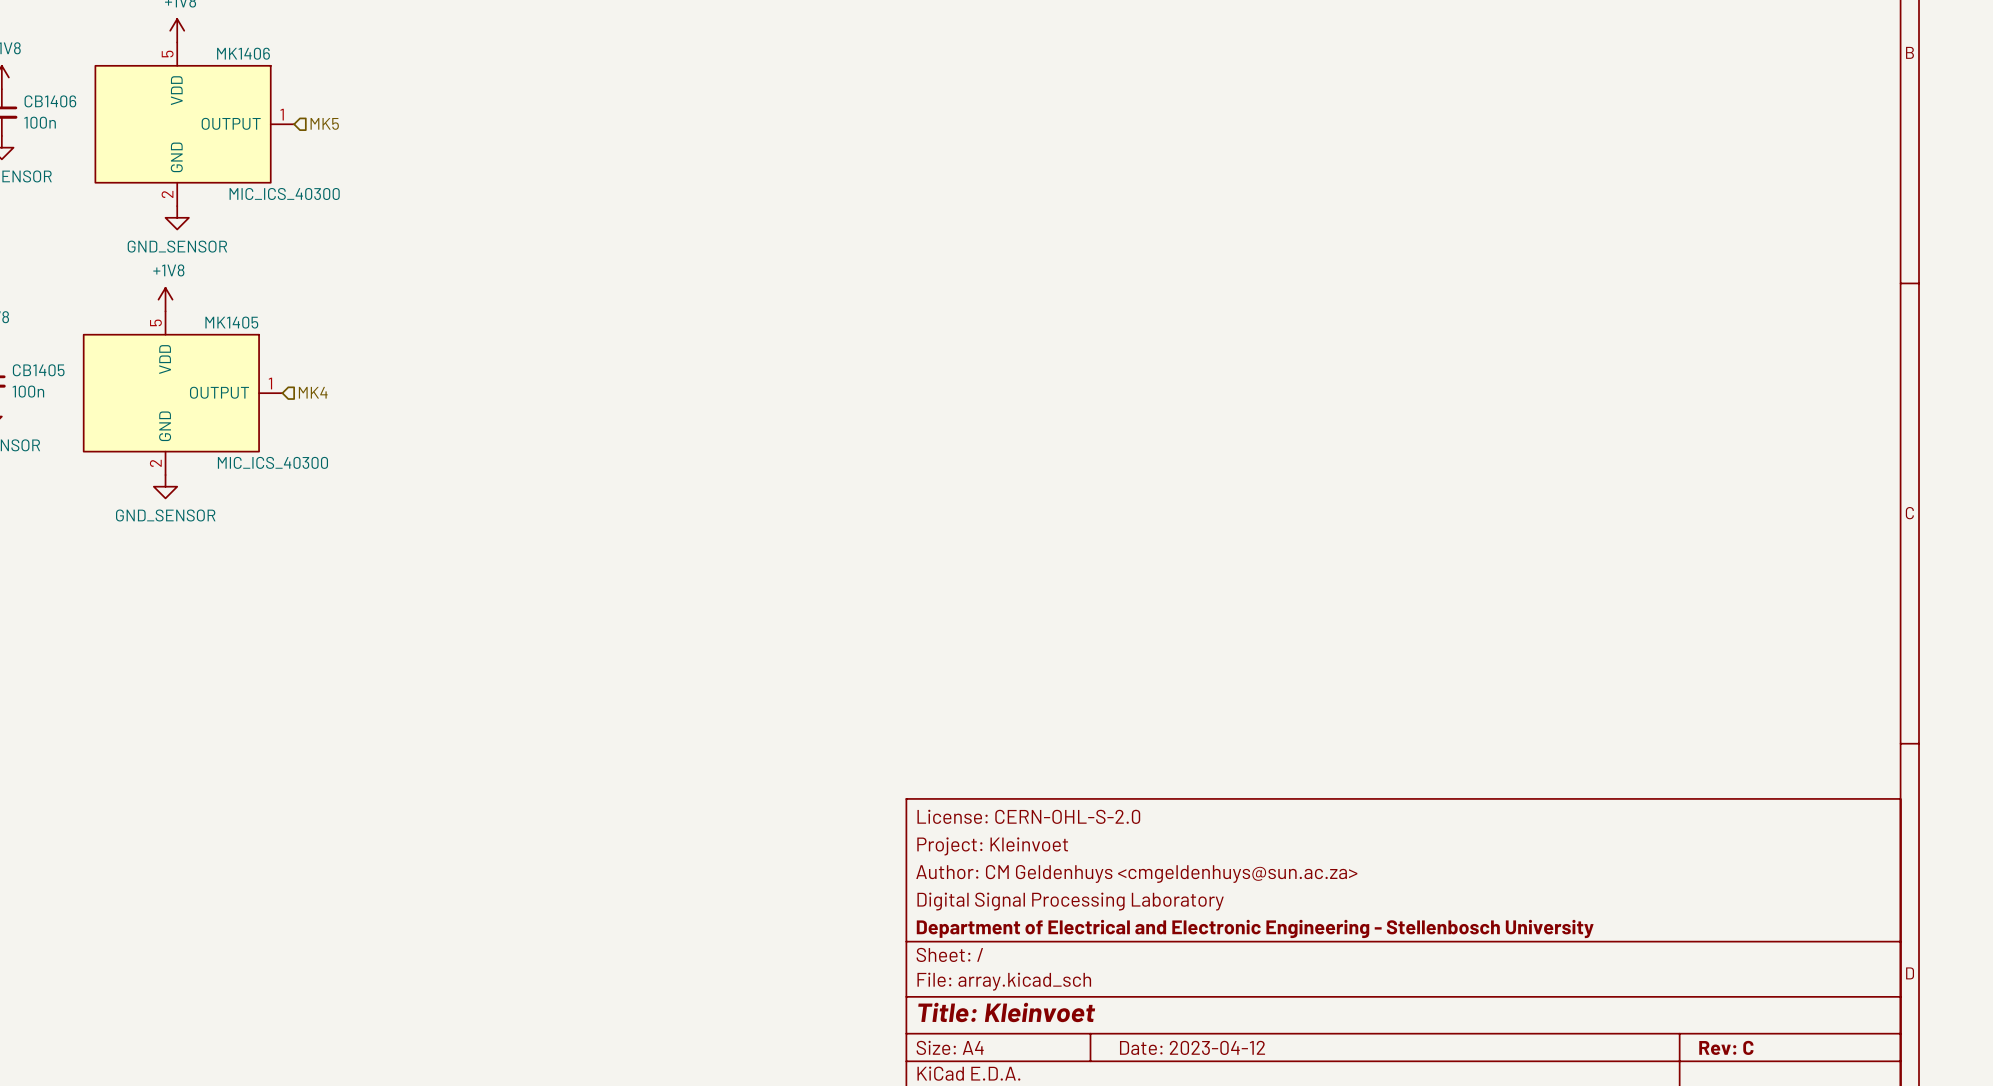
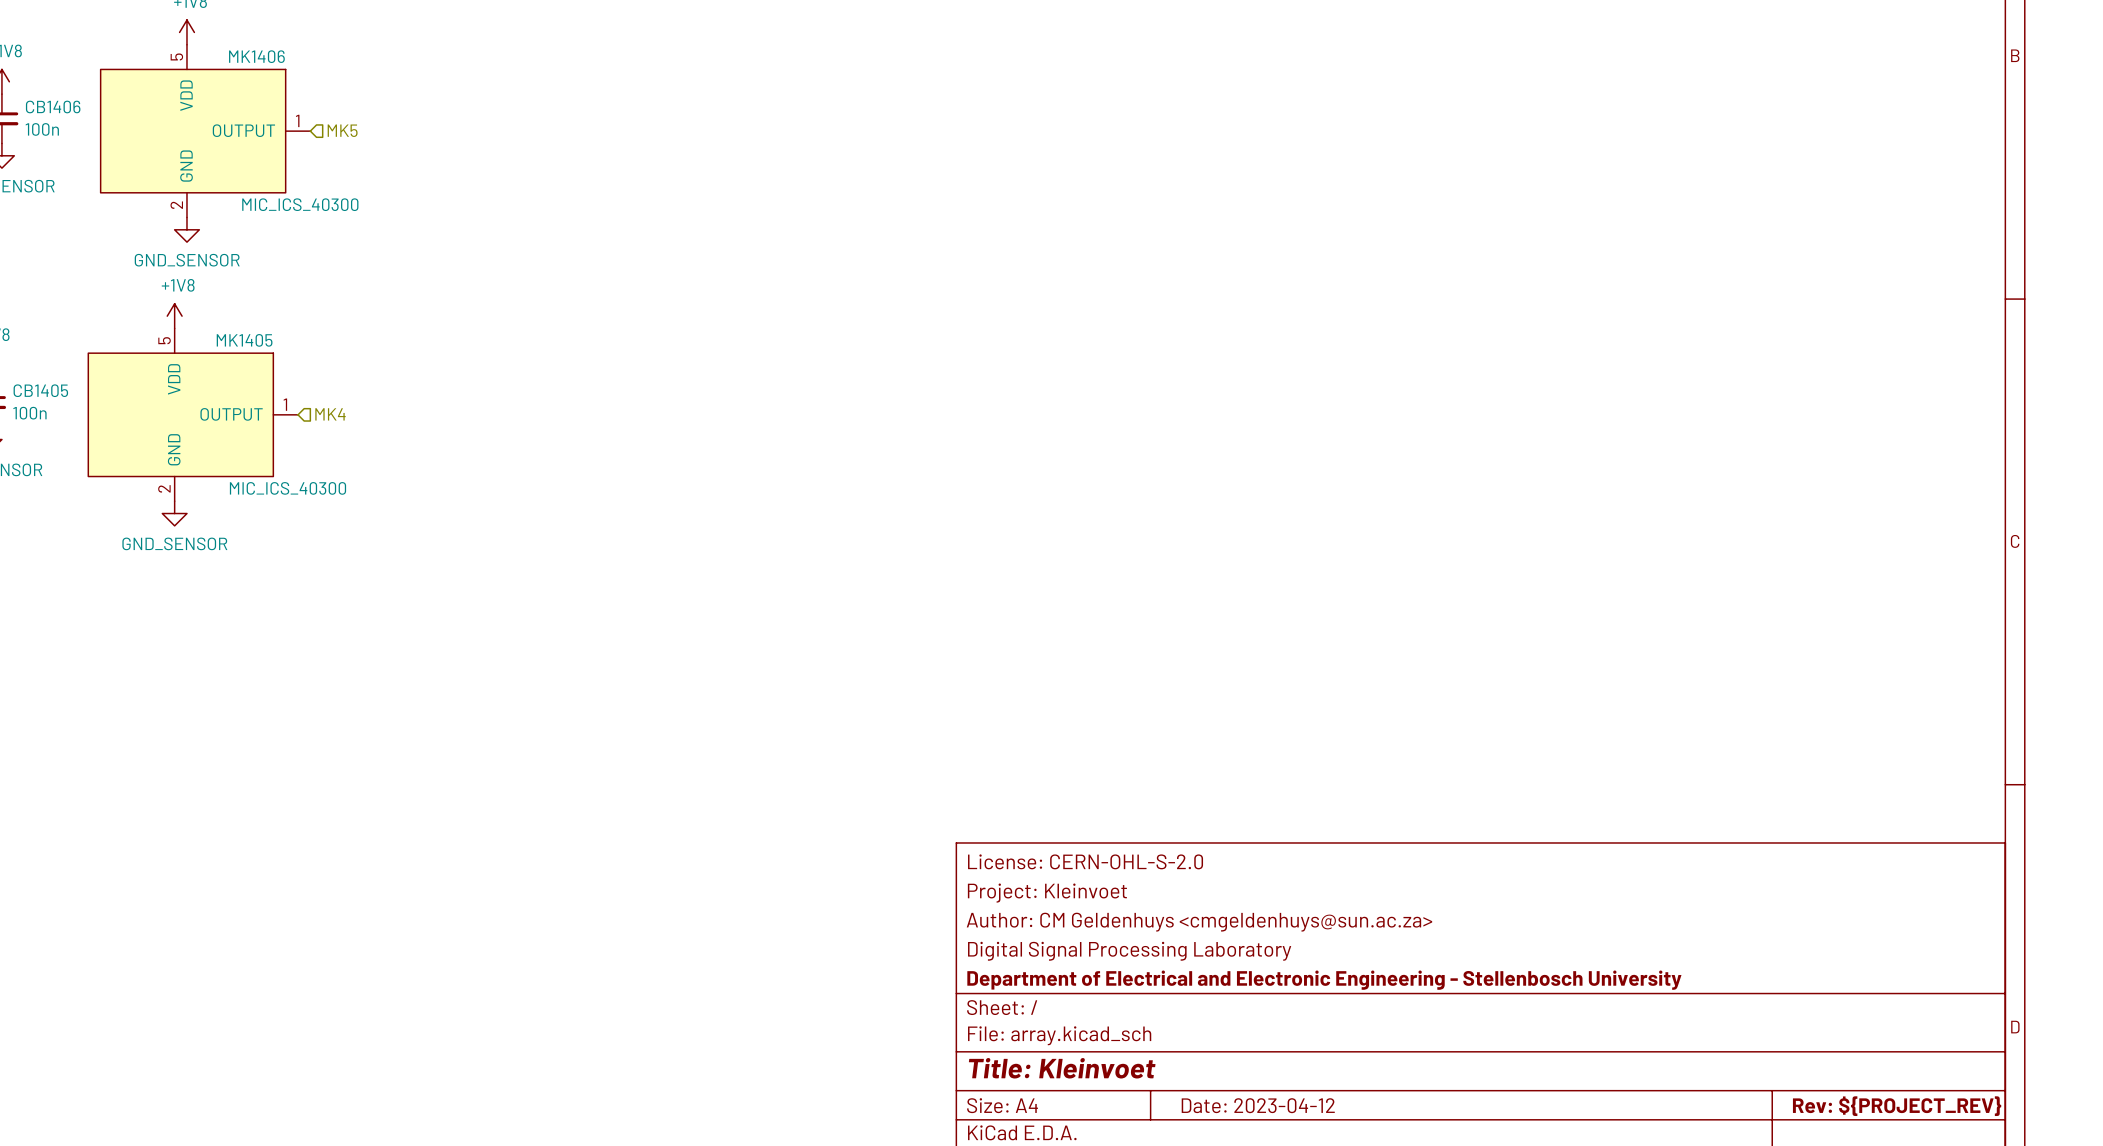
title block: Rev: C (1726, 1047) -> Rev: ${PROJECT_REV} (1897, 1106)

